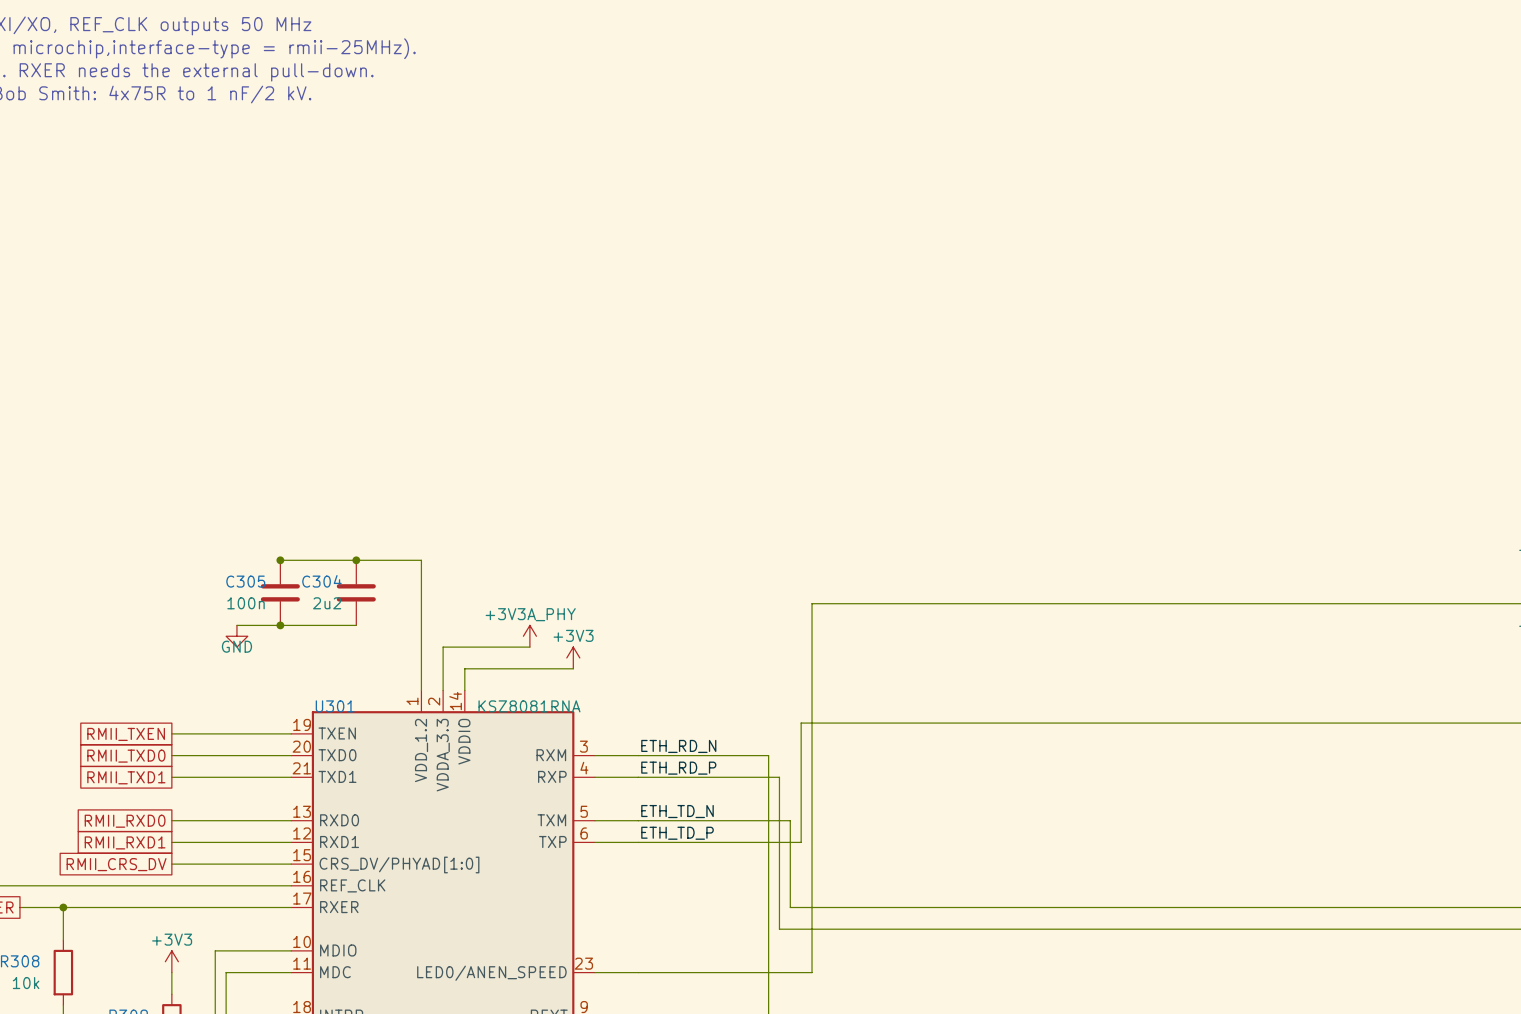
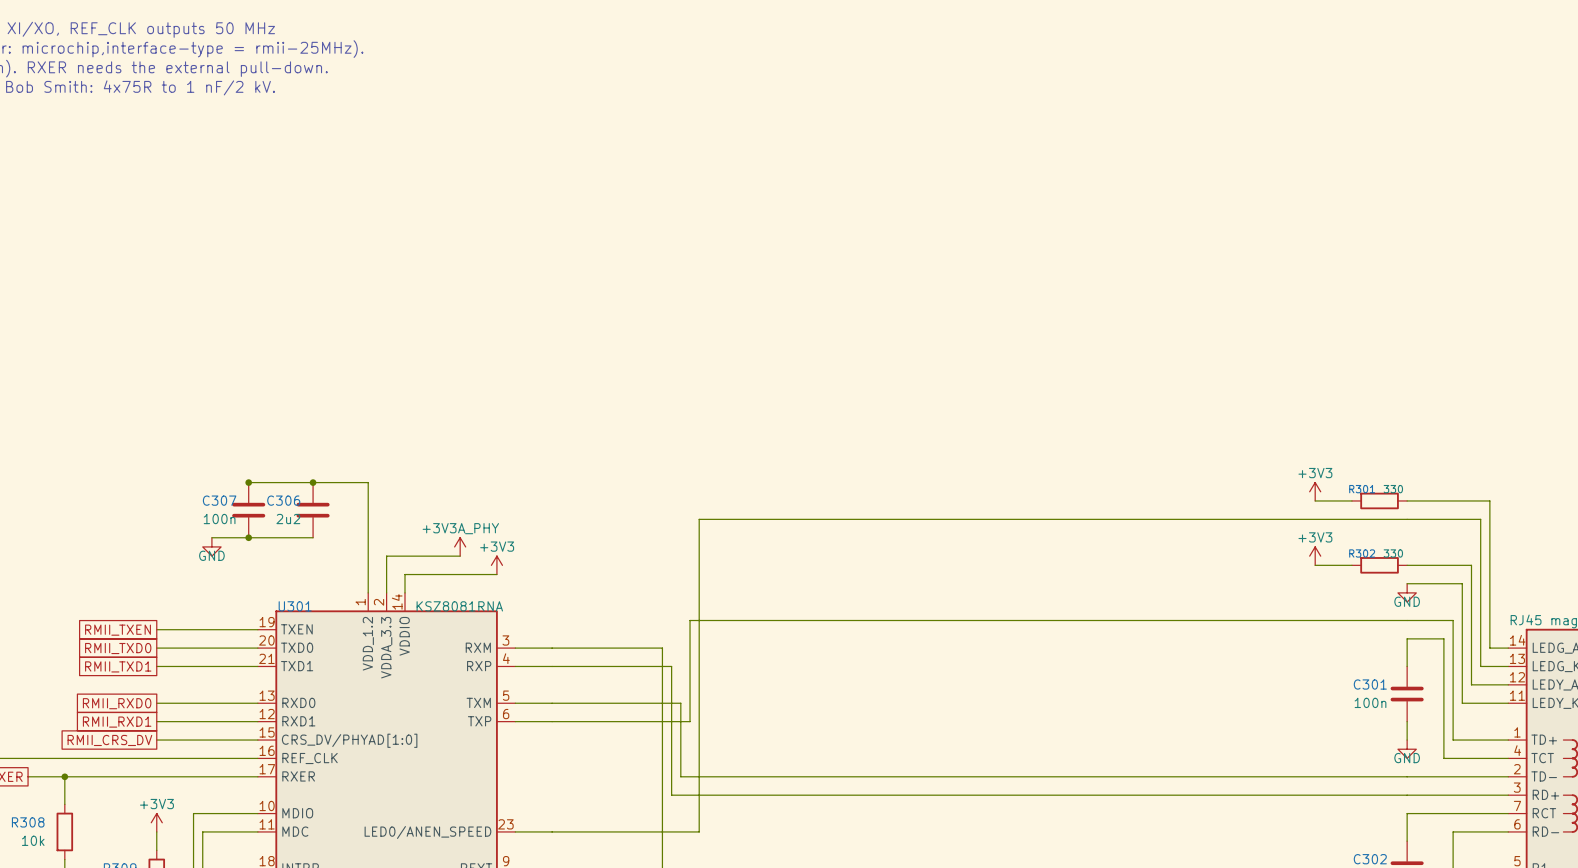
C305 name: C305 (245, 581) -> C307 (219, 500)
C304 name: C304 (321, 581) -> C306 (283, 500)
label: ETH_RD_N (678, 746) -> none
label: ETH_RD_P (678, 768) -> none
label: ETH_TD_N (677, 811) -> none
label: ETH_TD_P (677, 833) -> none

